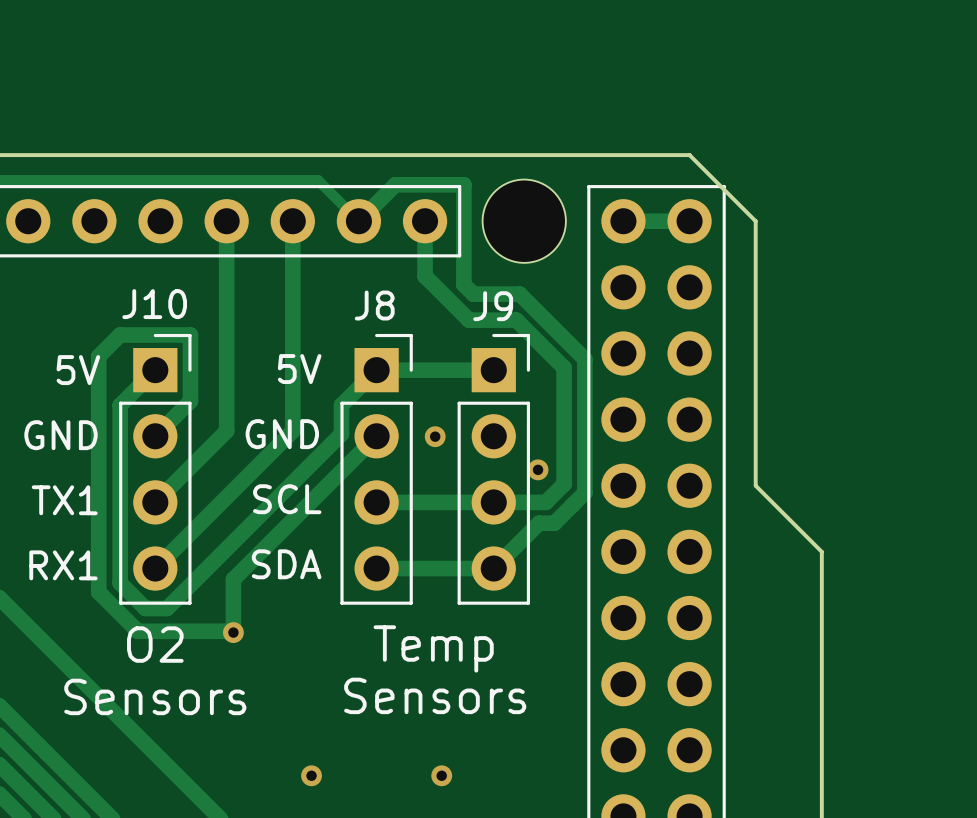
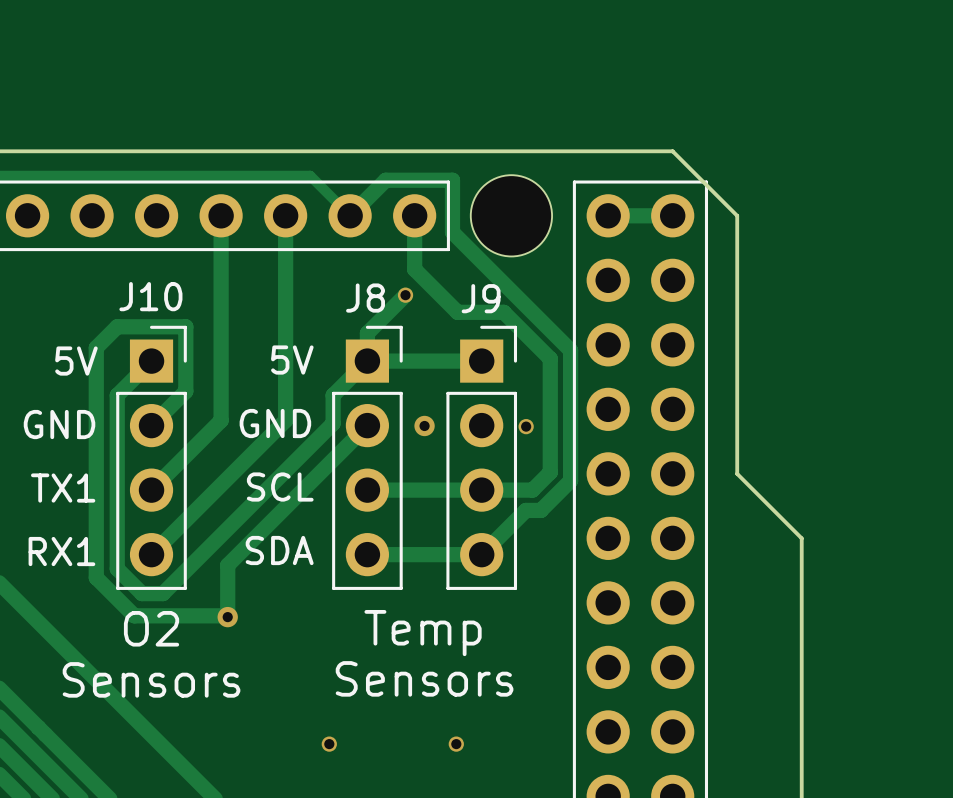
track: (463, 238) (463, 284) (473, 294) (519, 294) -> (452, 232) (507, 286)
track: none -> (405, 295) (367, 333) (367, 361)
via: none -> (405, 295)
via: none -> (526, 426)
via: (538, 469) -> none
via: none -> (329, 744)
via: none -> (456, 744)
via: (311, 775) -> none
via: (441, 775) -> none

